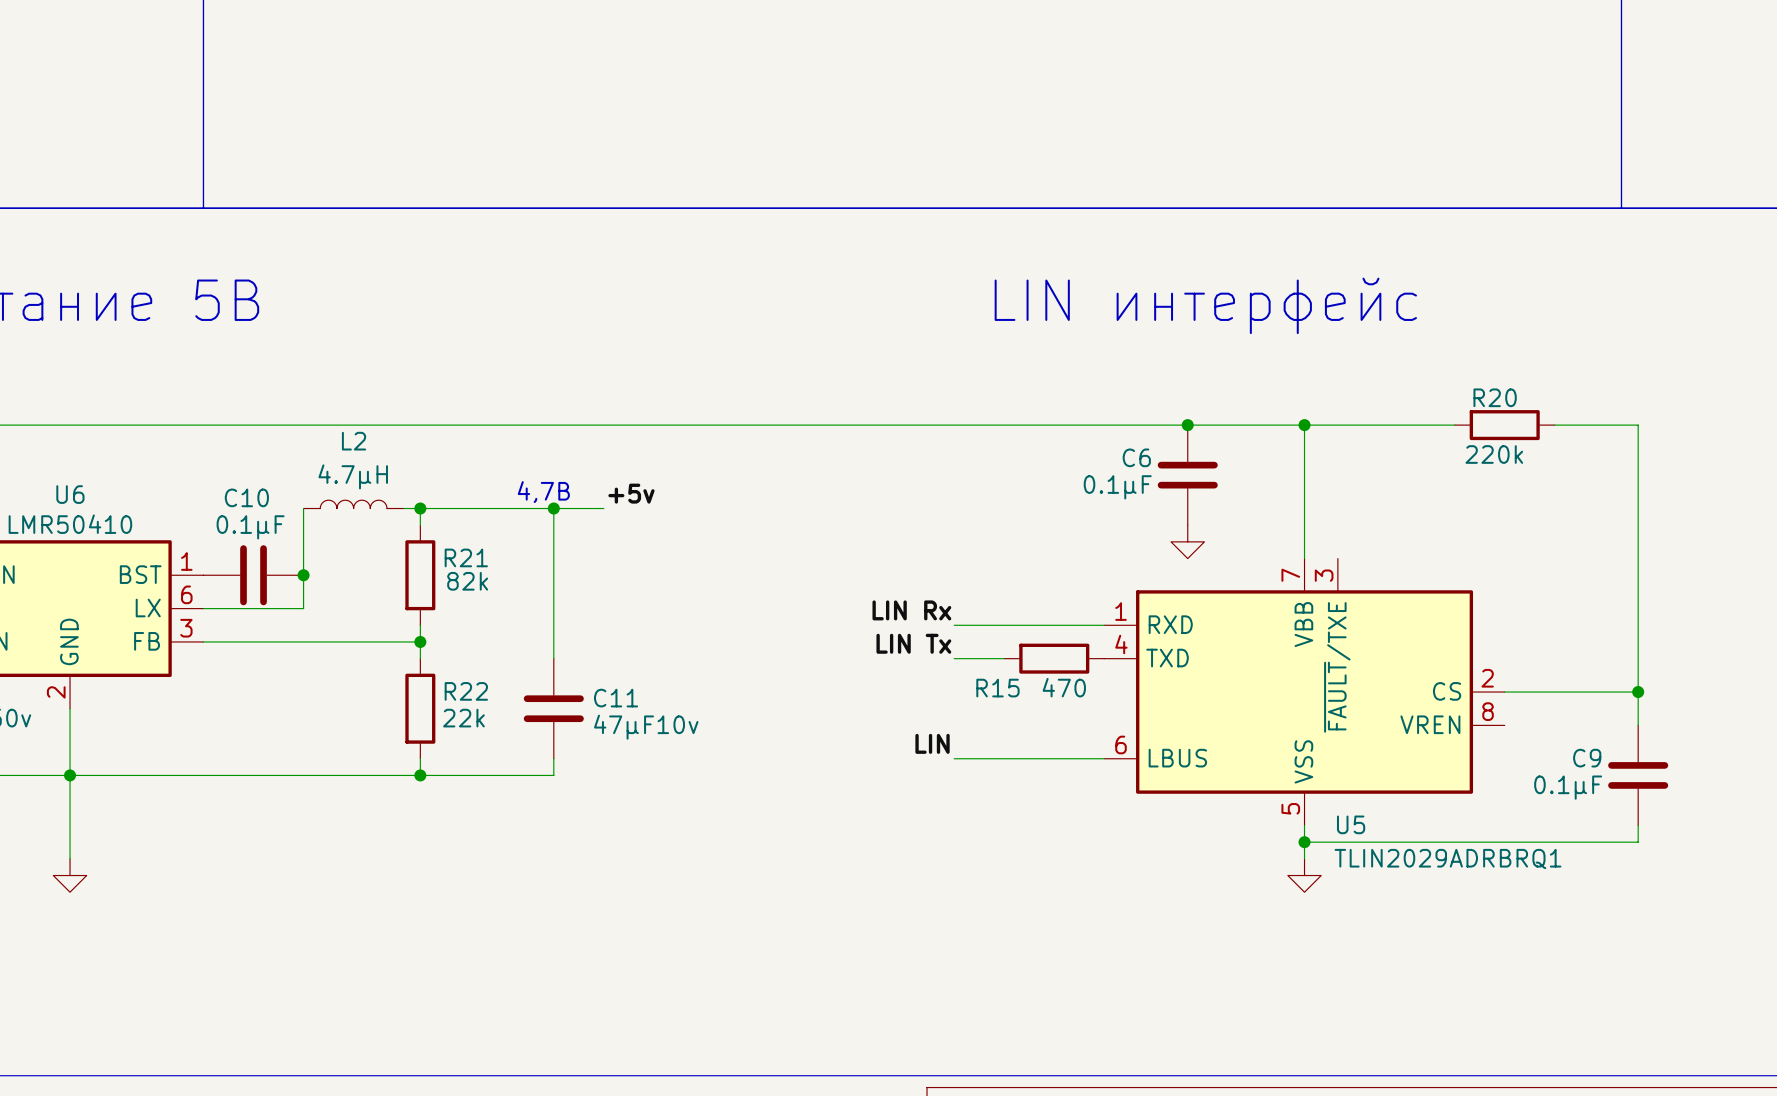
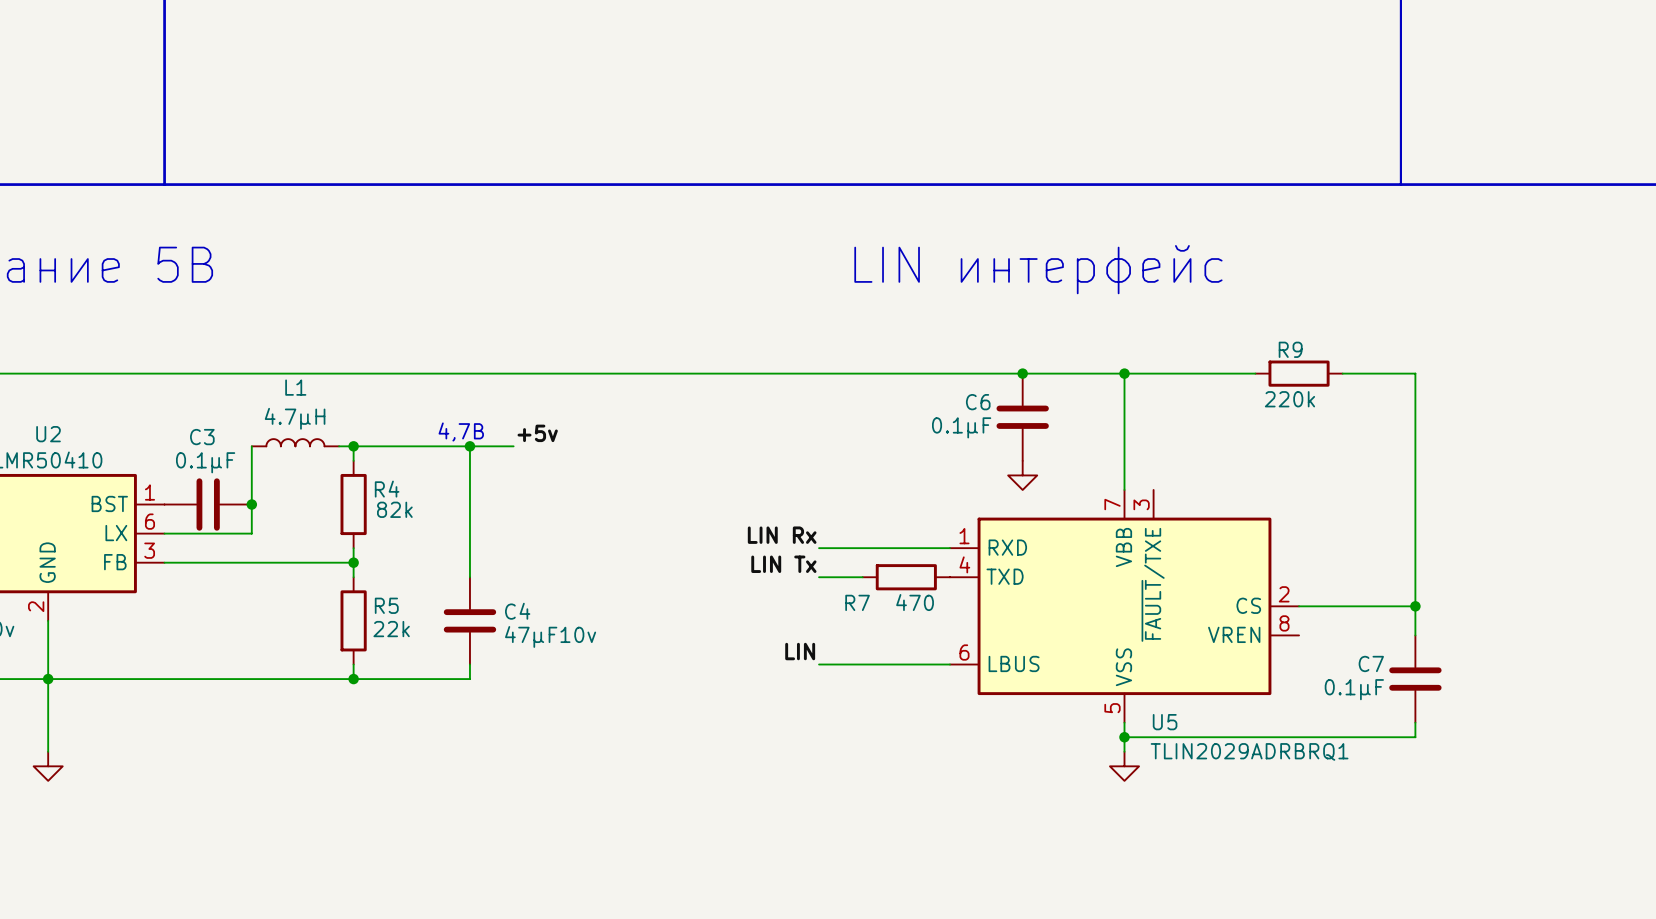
R20 name: R20 (1495, 397) -> R9 (1290, 349)
L2 name: L2 (354, 441) -> L1 (295, 387)
U6 name: U6 (70, 494) -> U2 (48, 434)
C10 name: C10 (246, 497) -> C3 (202, 437)
R21 name: R21 (466, 557) -> R4 (387, 489)
R15 name: R15 (997, 688) -> R7 (857, 602)
R22 name: R22 (466, 691) -> R5 (386, 605)
C11 name: C11 (616, 698) -> C4 (517, 611)
C9 name: C9 (1587, 758) -> C7 (1371, 663)

